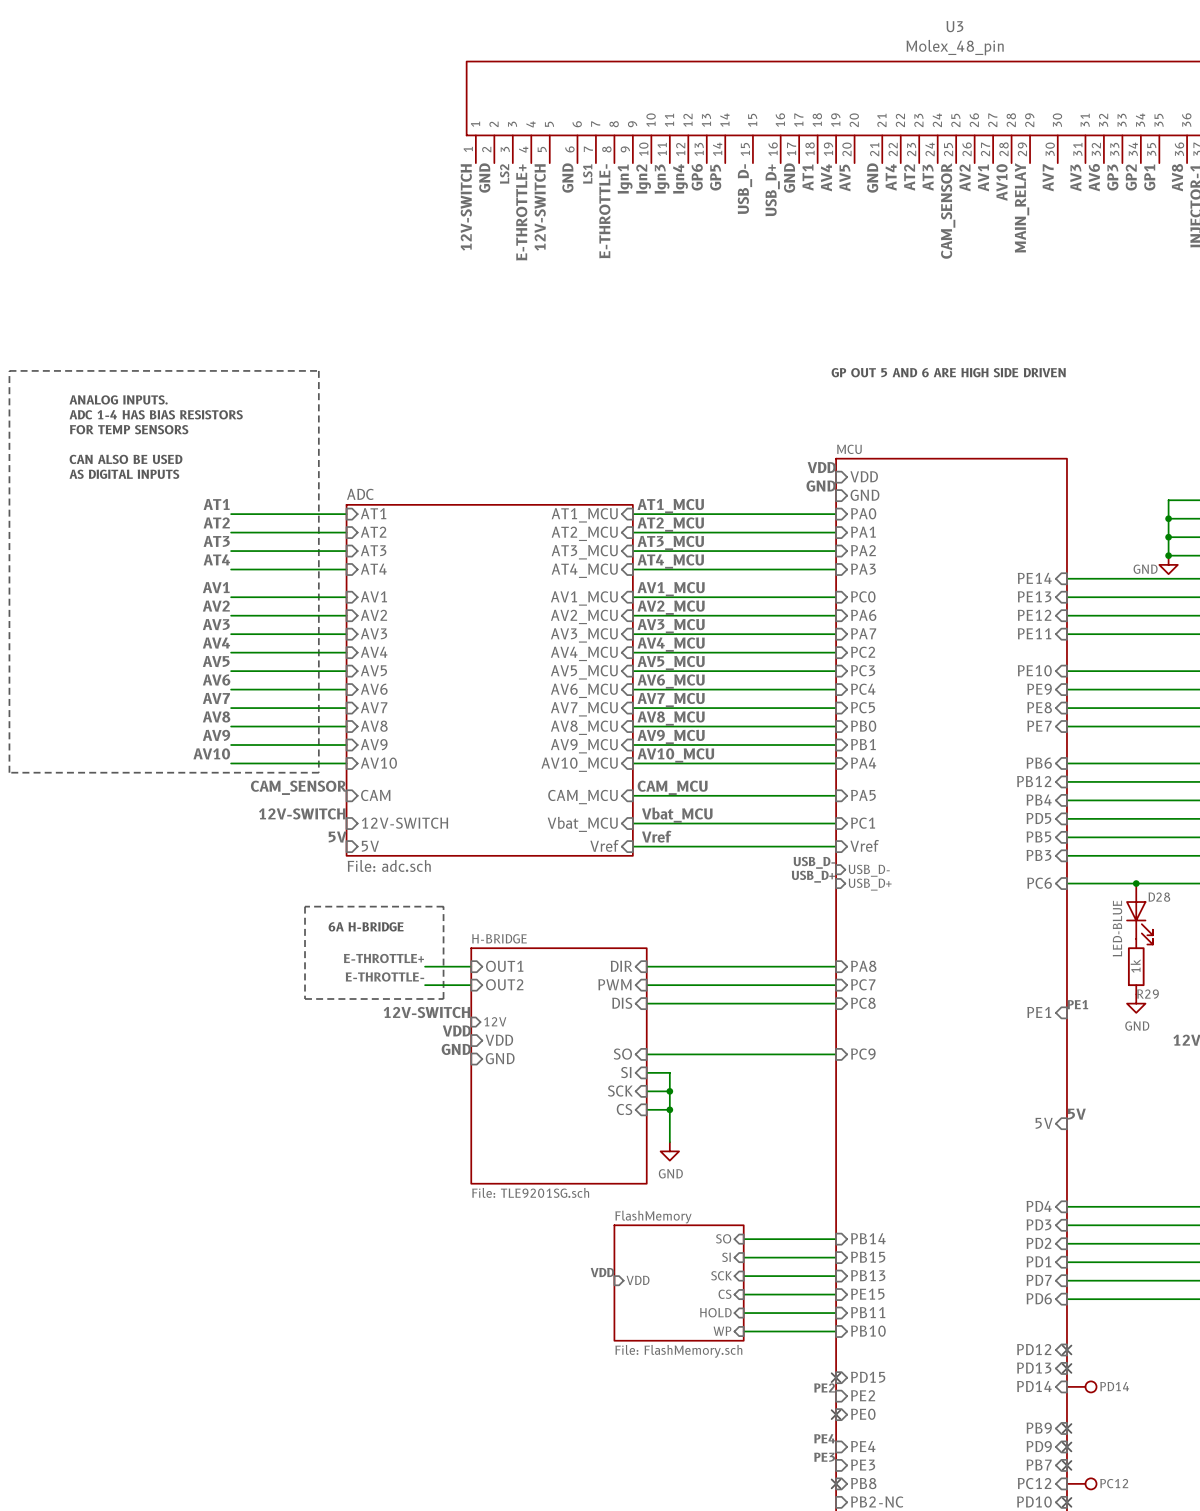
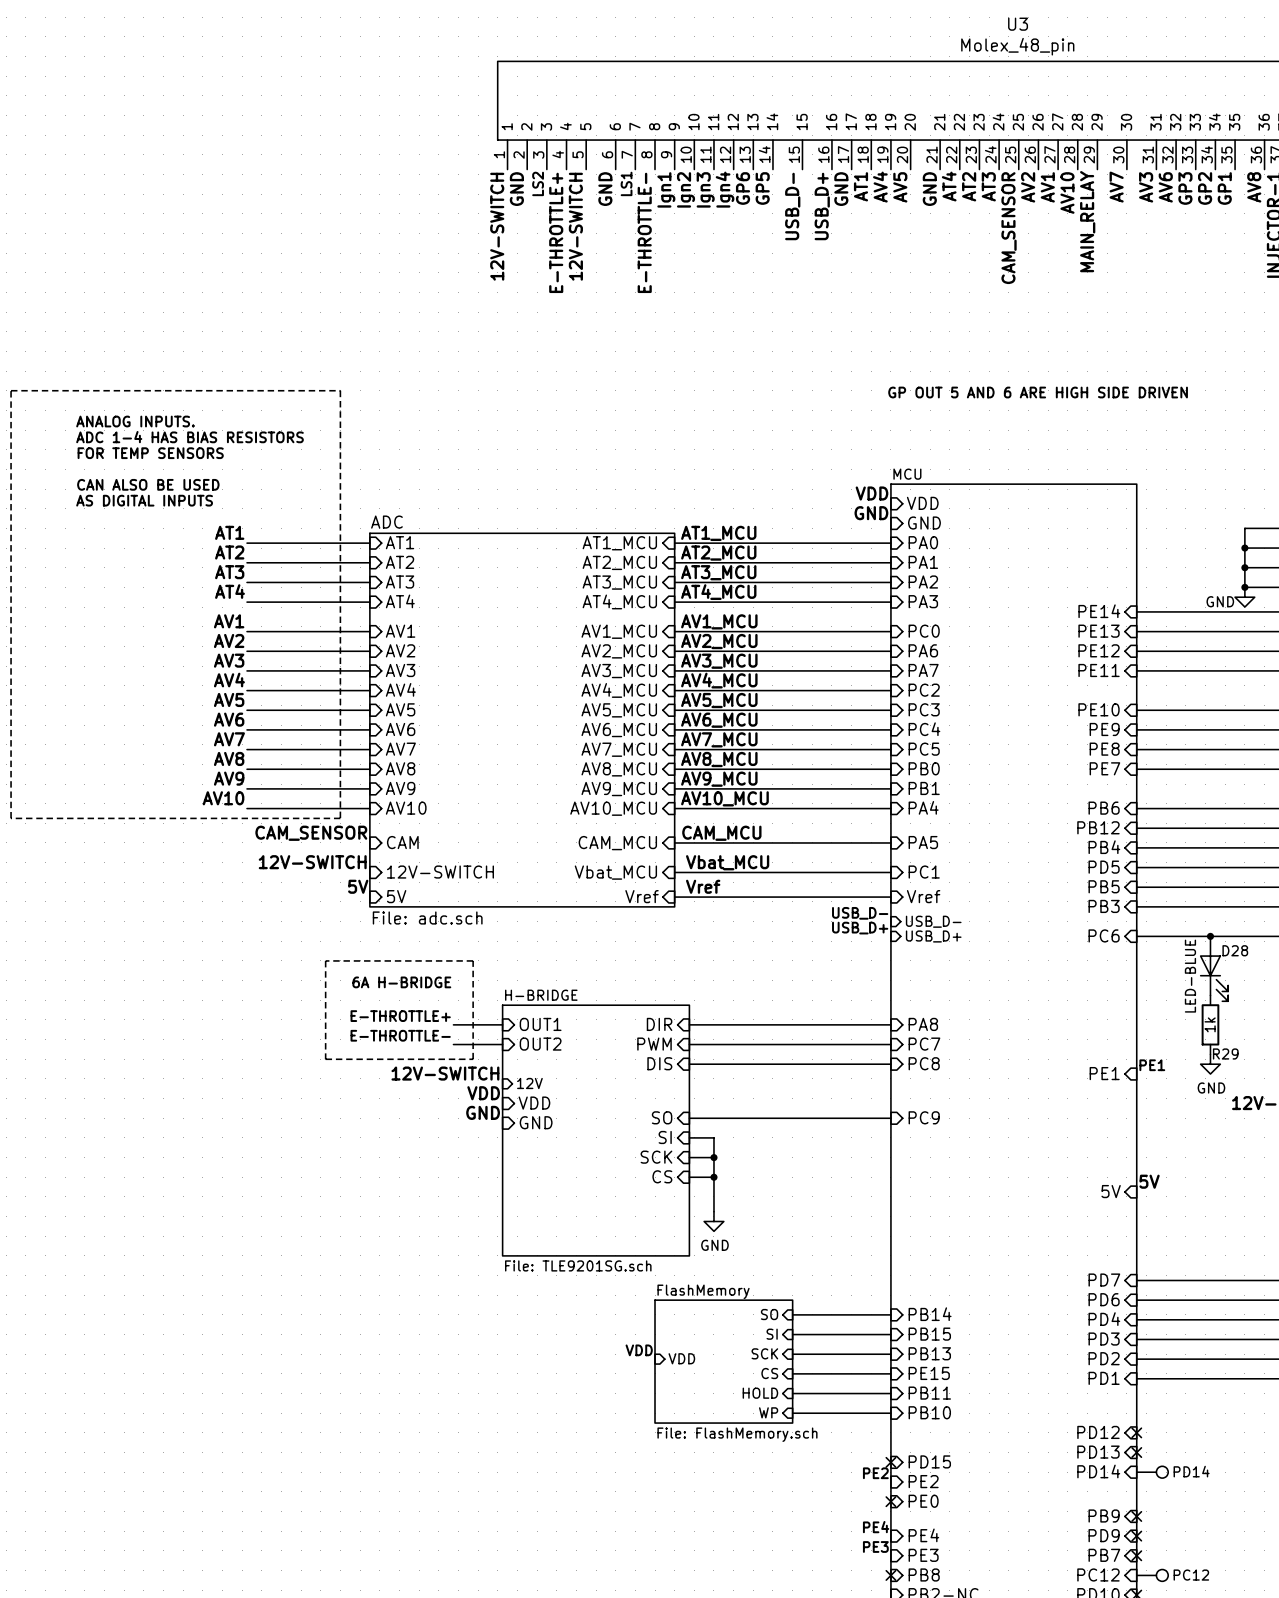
sheet pin: PD4 (1039, 1206) -> PD7 (1104, 1280)
sheet pin: PD3 (1038, 1224) -> PD6 (1104, 1299)
sheet pin: PD2 (1038, 1243) -> PD4 (1104, 1319)
sheet pin: PD1 (1038, 1261) -> PD3 (1104, 1339)
sheet pin: PD7 (1039, 1280) -> PD2 (1104, 1358)
sheet pin: PD6 (1039, 1298) -> PD1 (1104, 1378)

